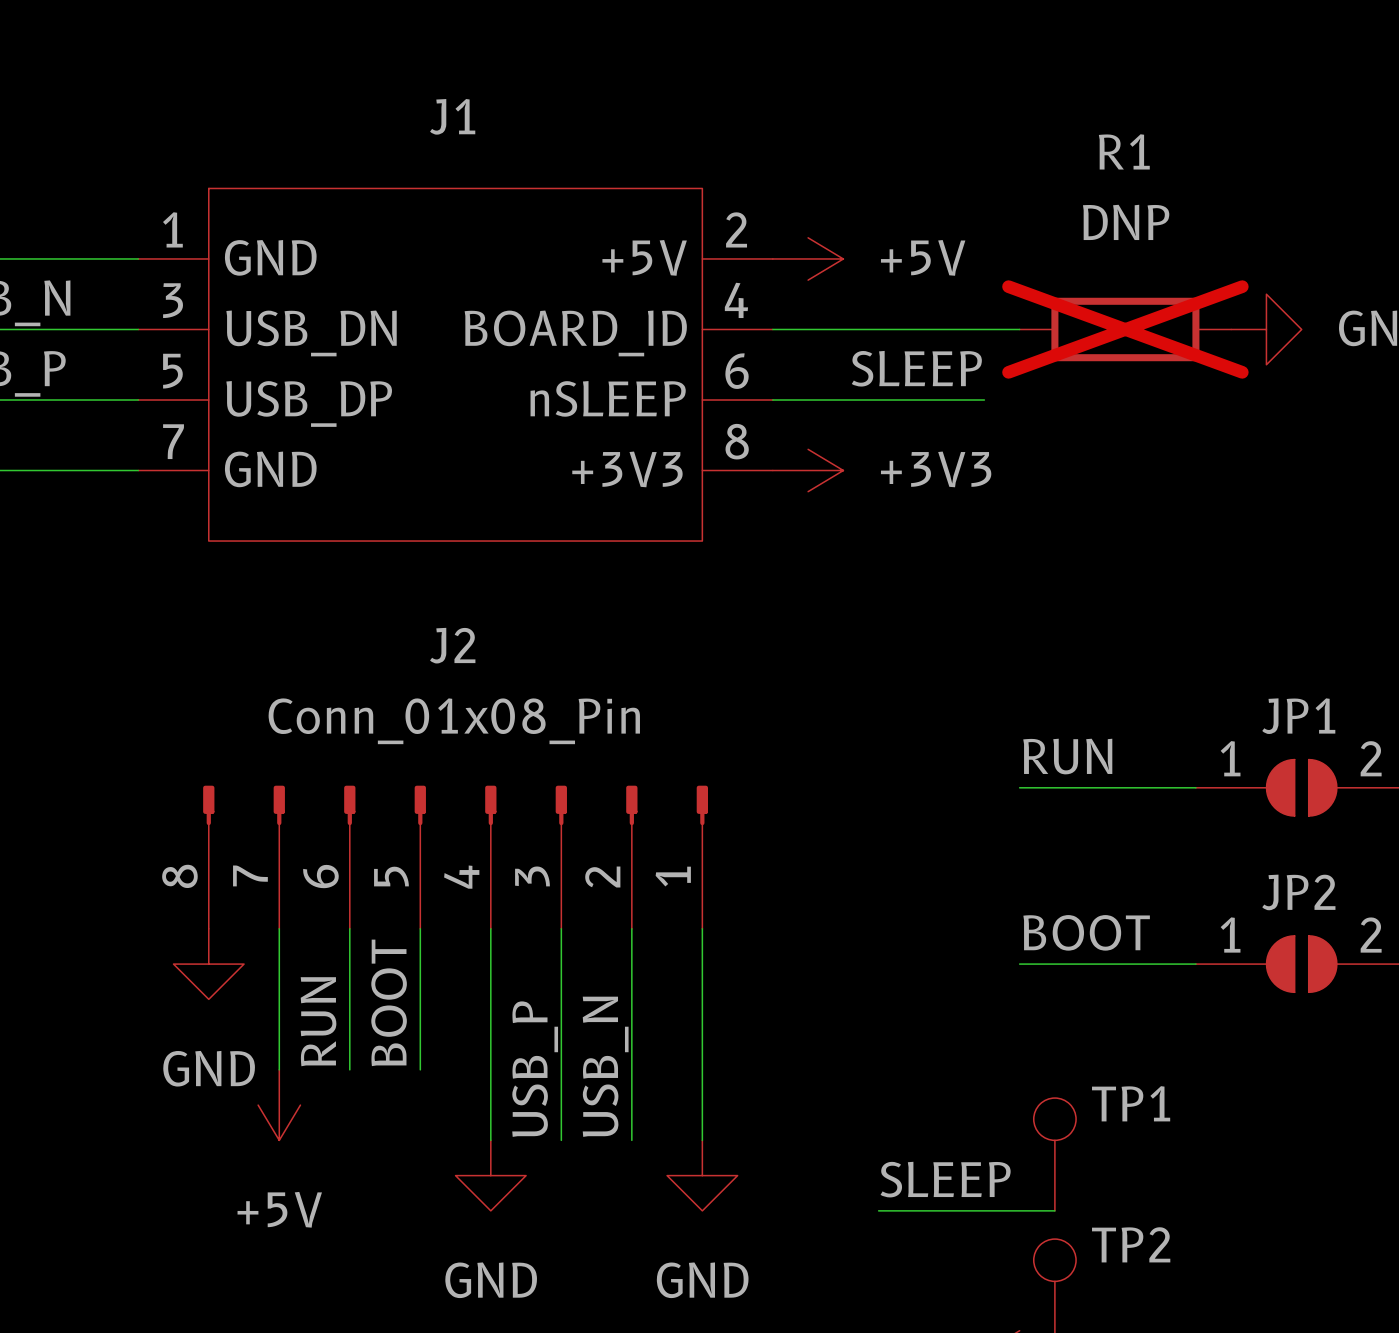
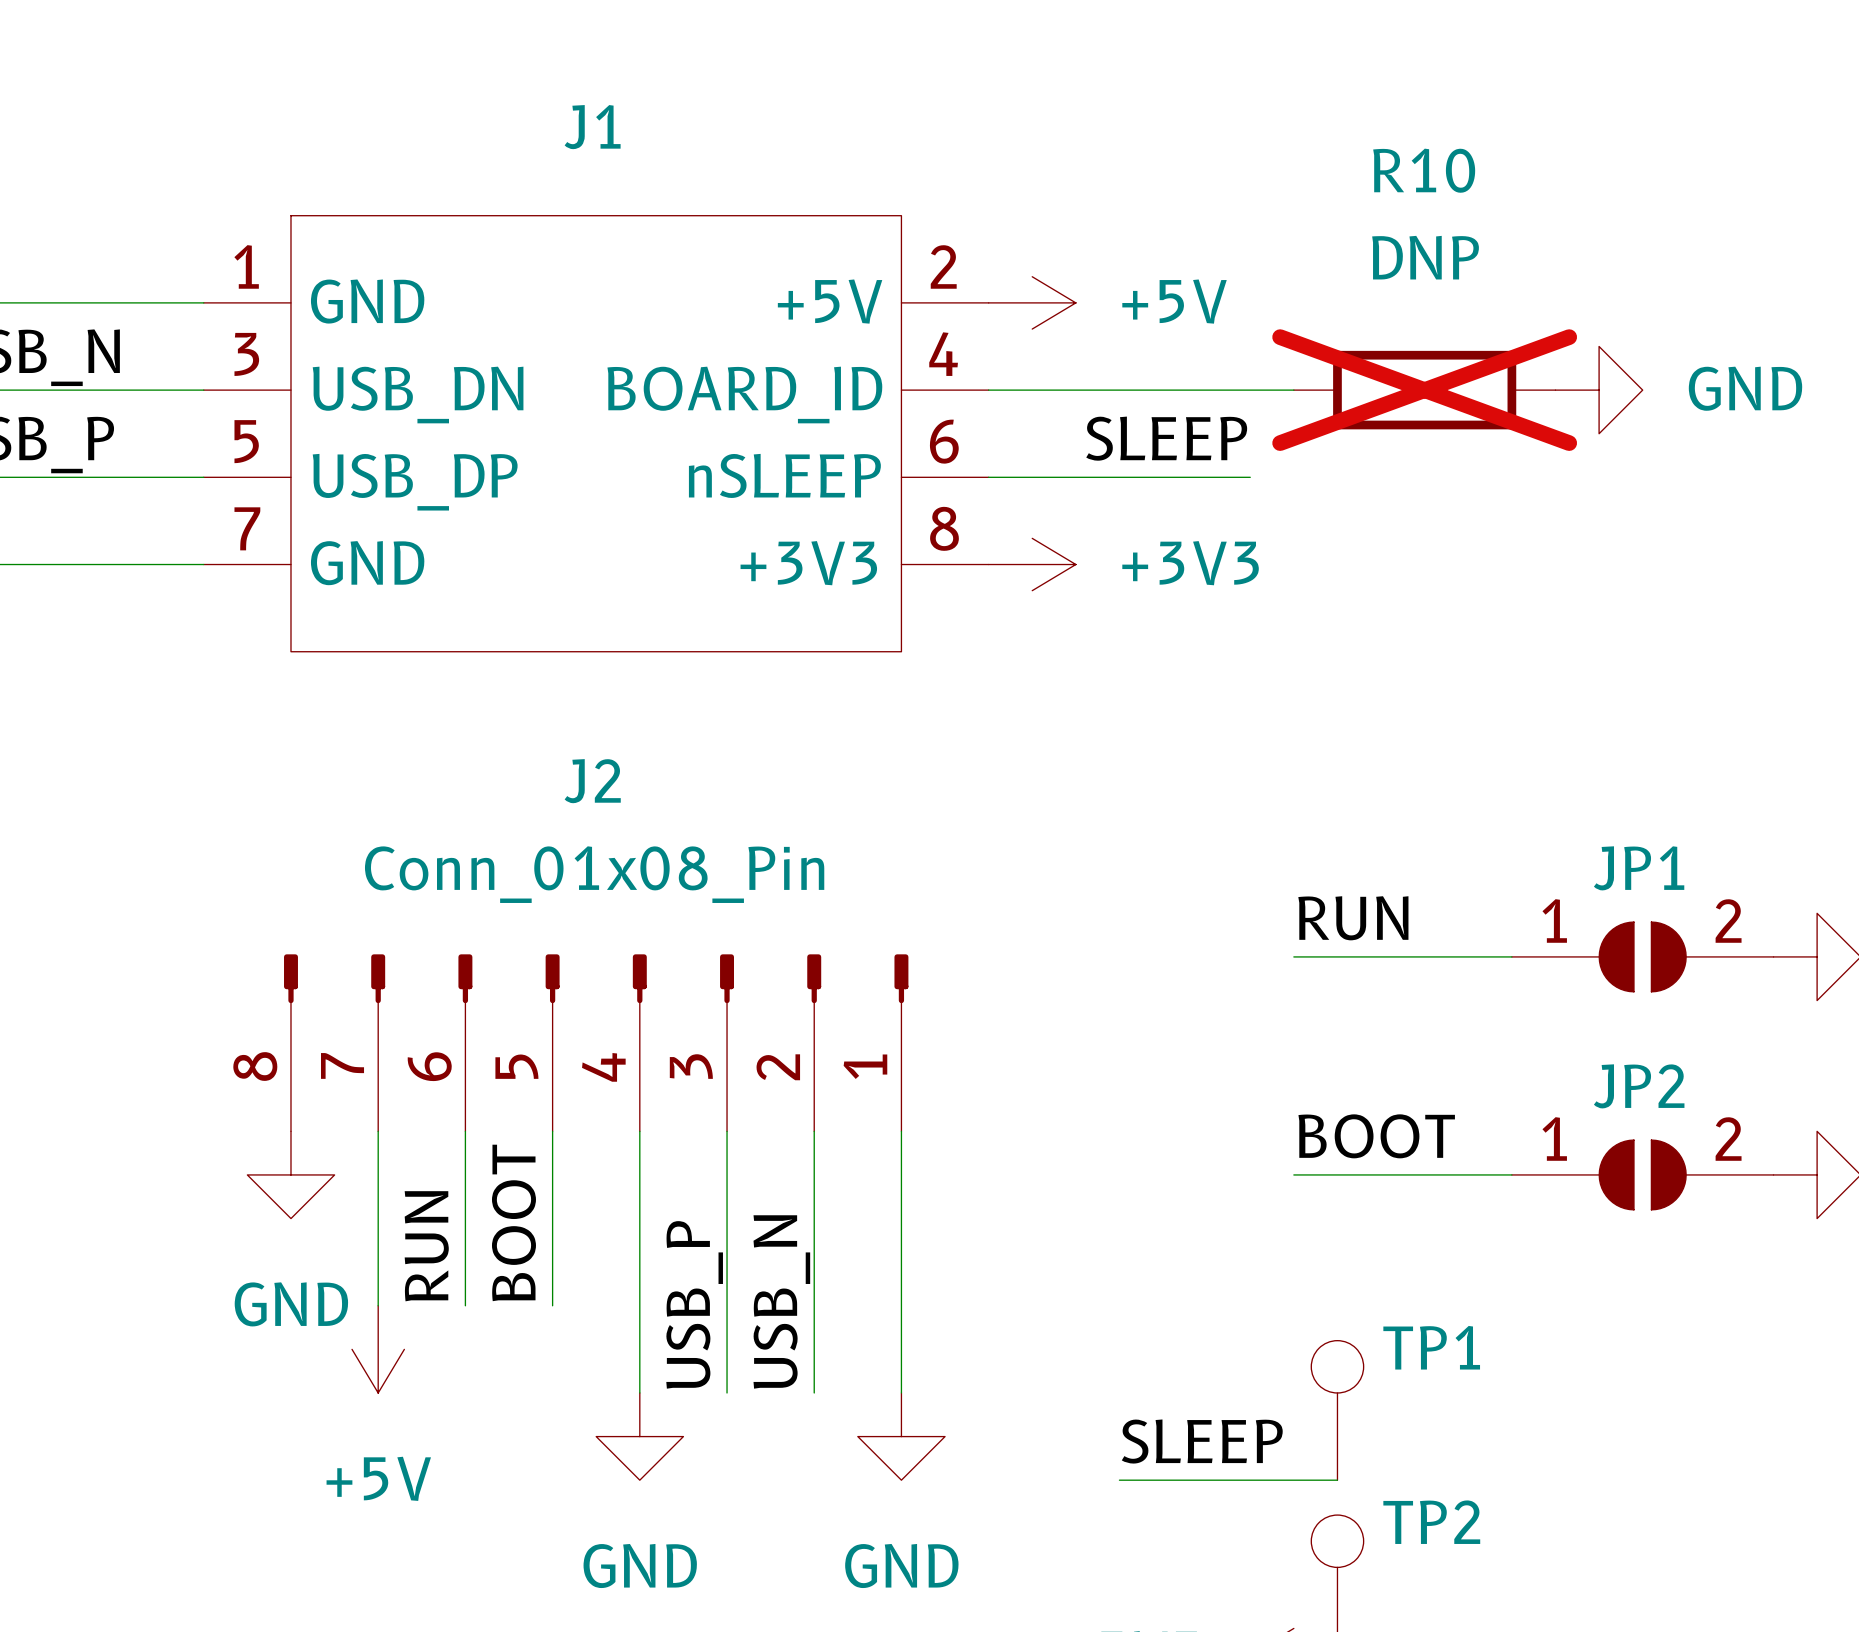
R1 name: R1 (1124, 151) -> R10 (1424, 170)

